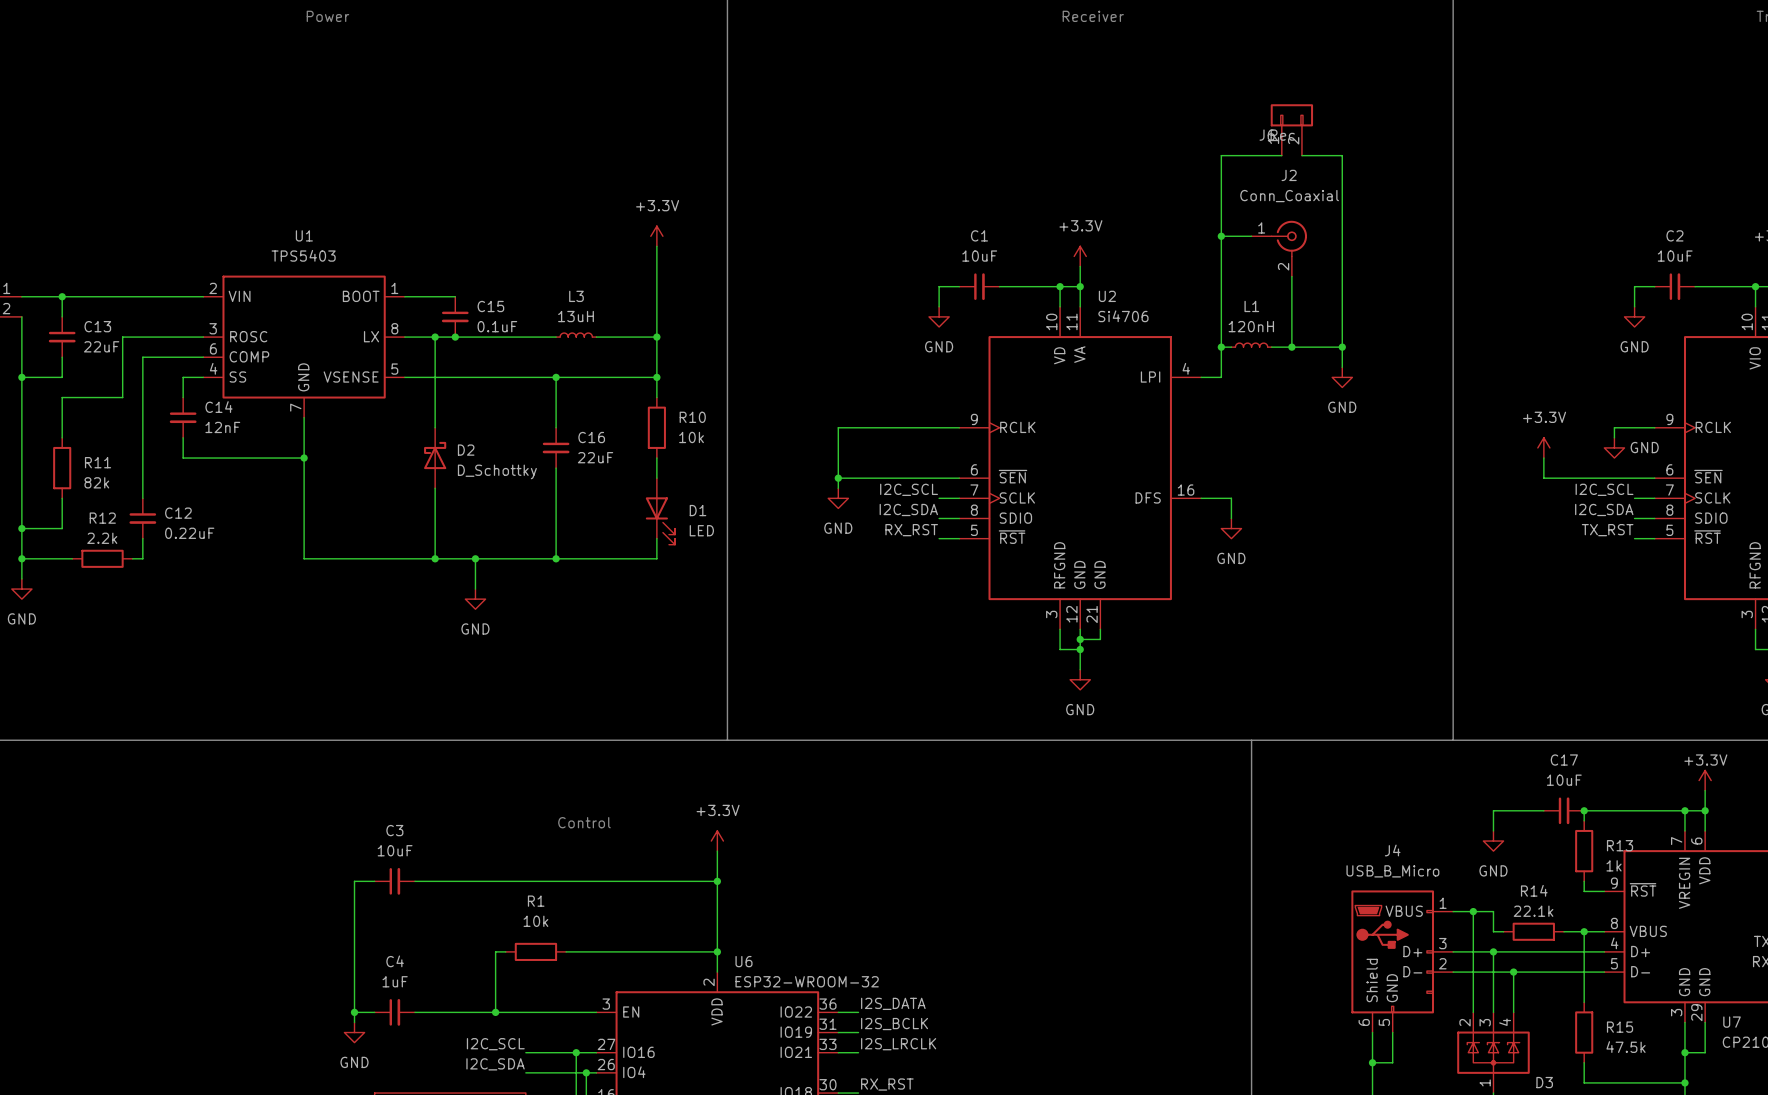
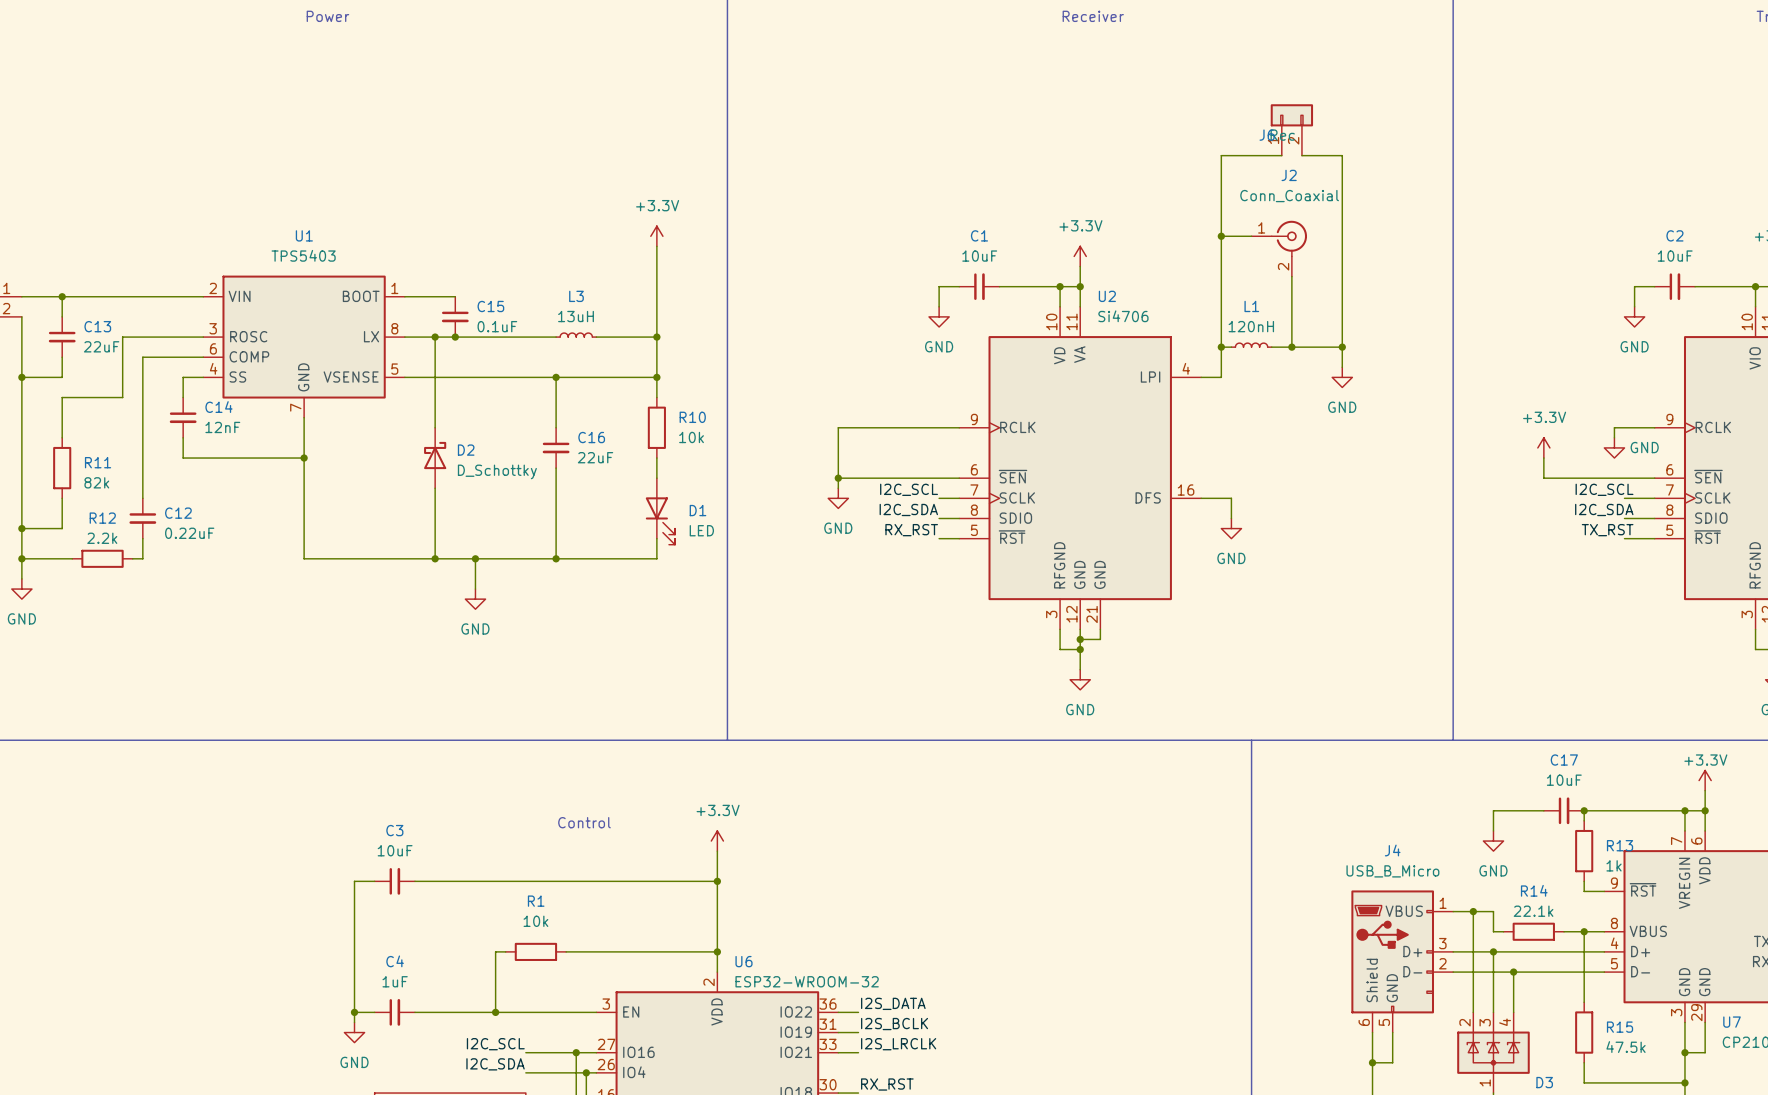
wire: none -> (1624, 498) (1634, 498)
wire: none -> (1624, 518) (1634, 518)
wire: none -> (1624, 538) (1634, 538)

